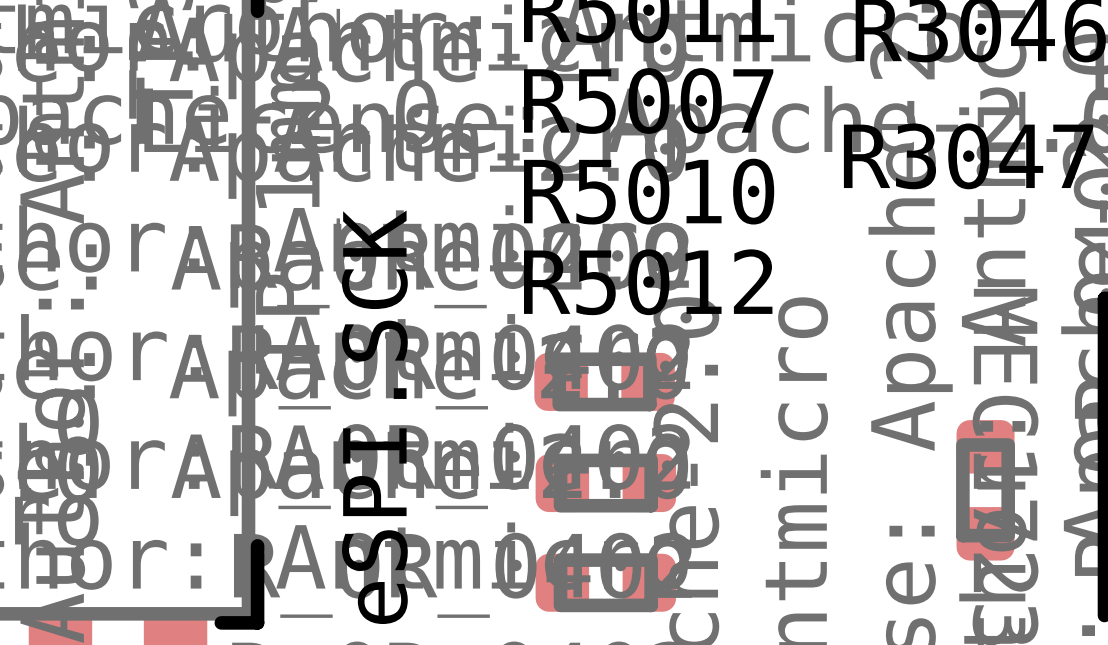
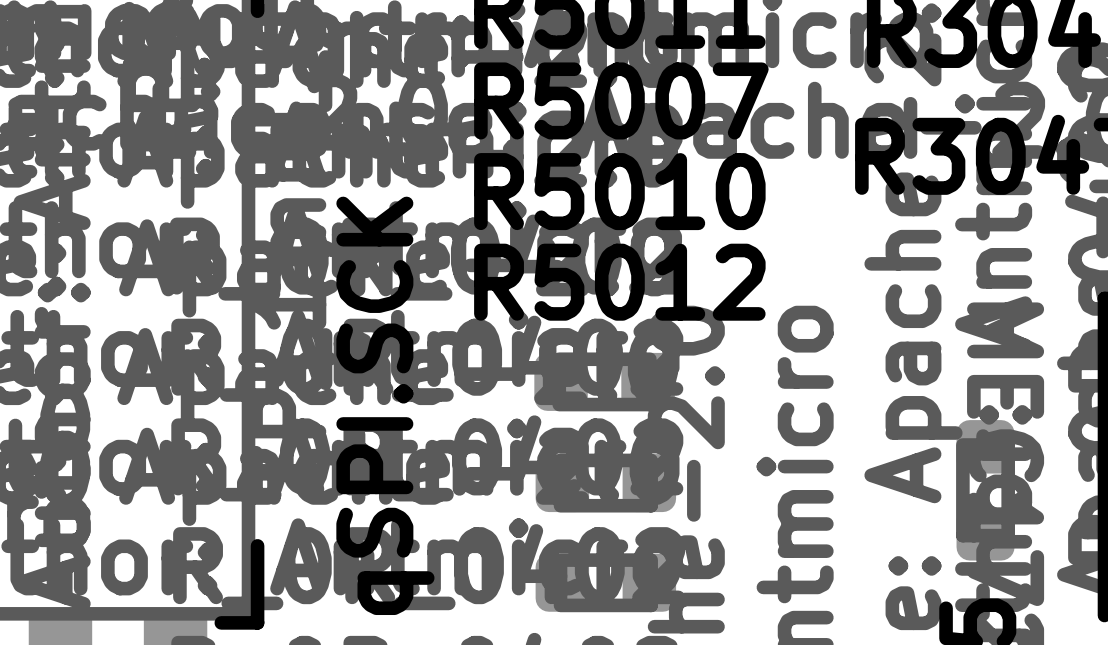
text: eSPI.SCK (374, 417) -> qSPI.SCK (385, 405)

